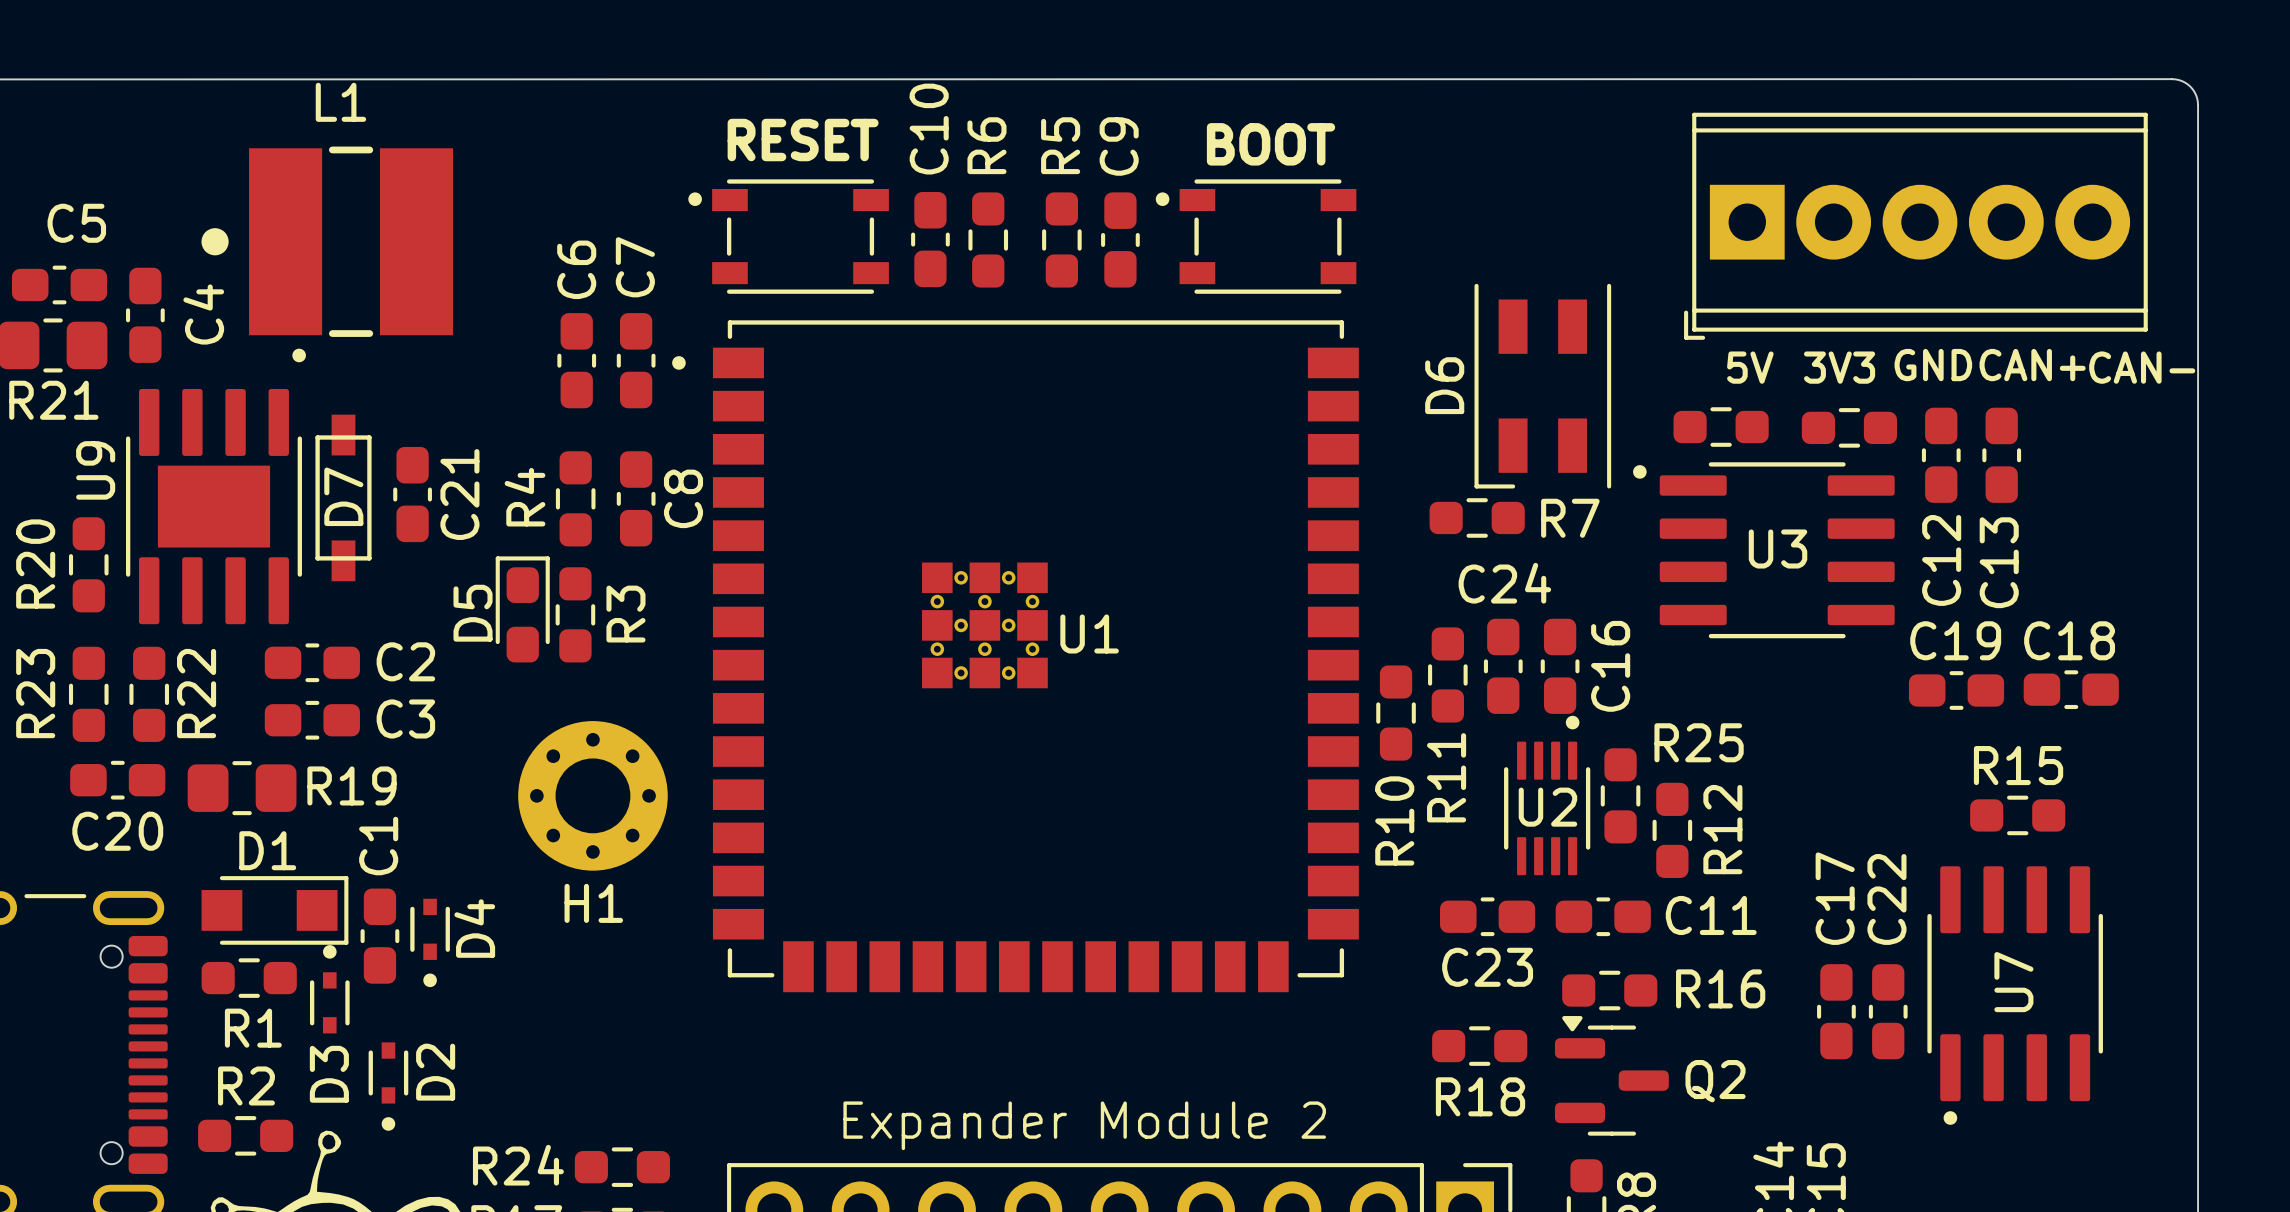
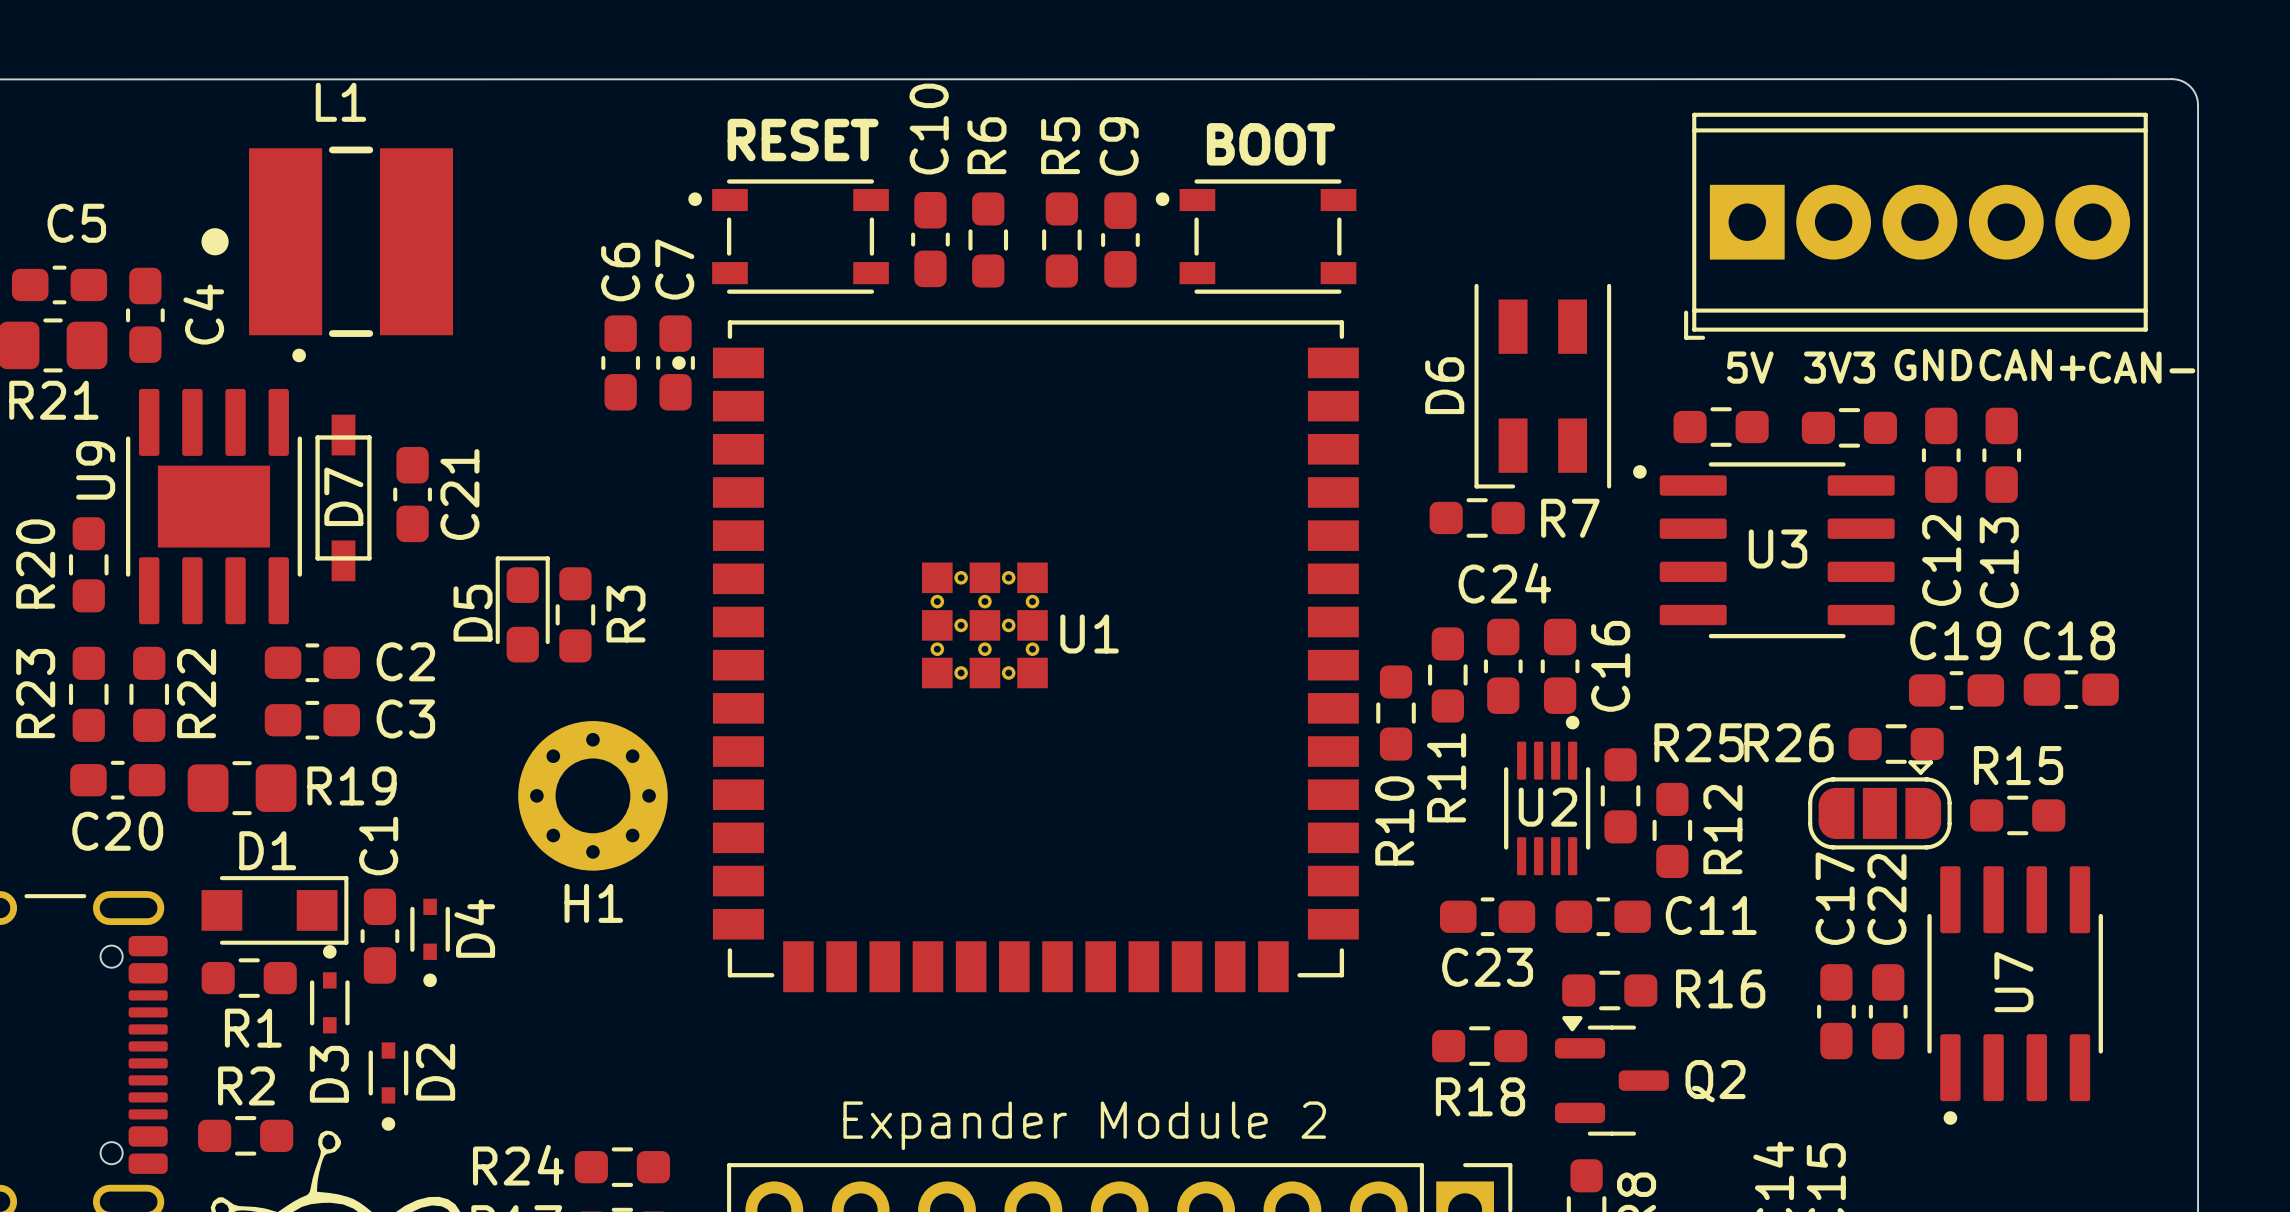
C6 position: (576, 360) -> (620, 362)
C7 position: (636, 360) -> (675, 362)
R4: (575, 498) -> none
C8: (636, 498) -> none
R26: none -> (1896, 744)
part: none -> (1879, 804)

